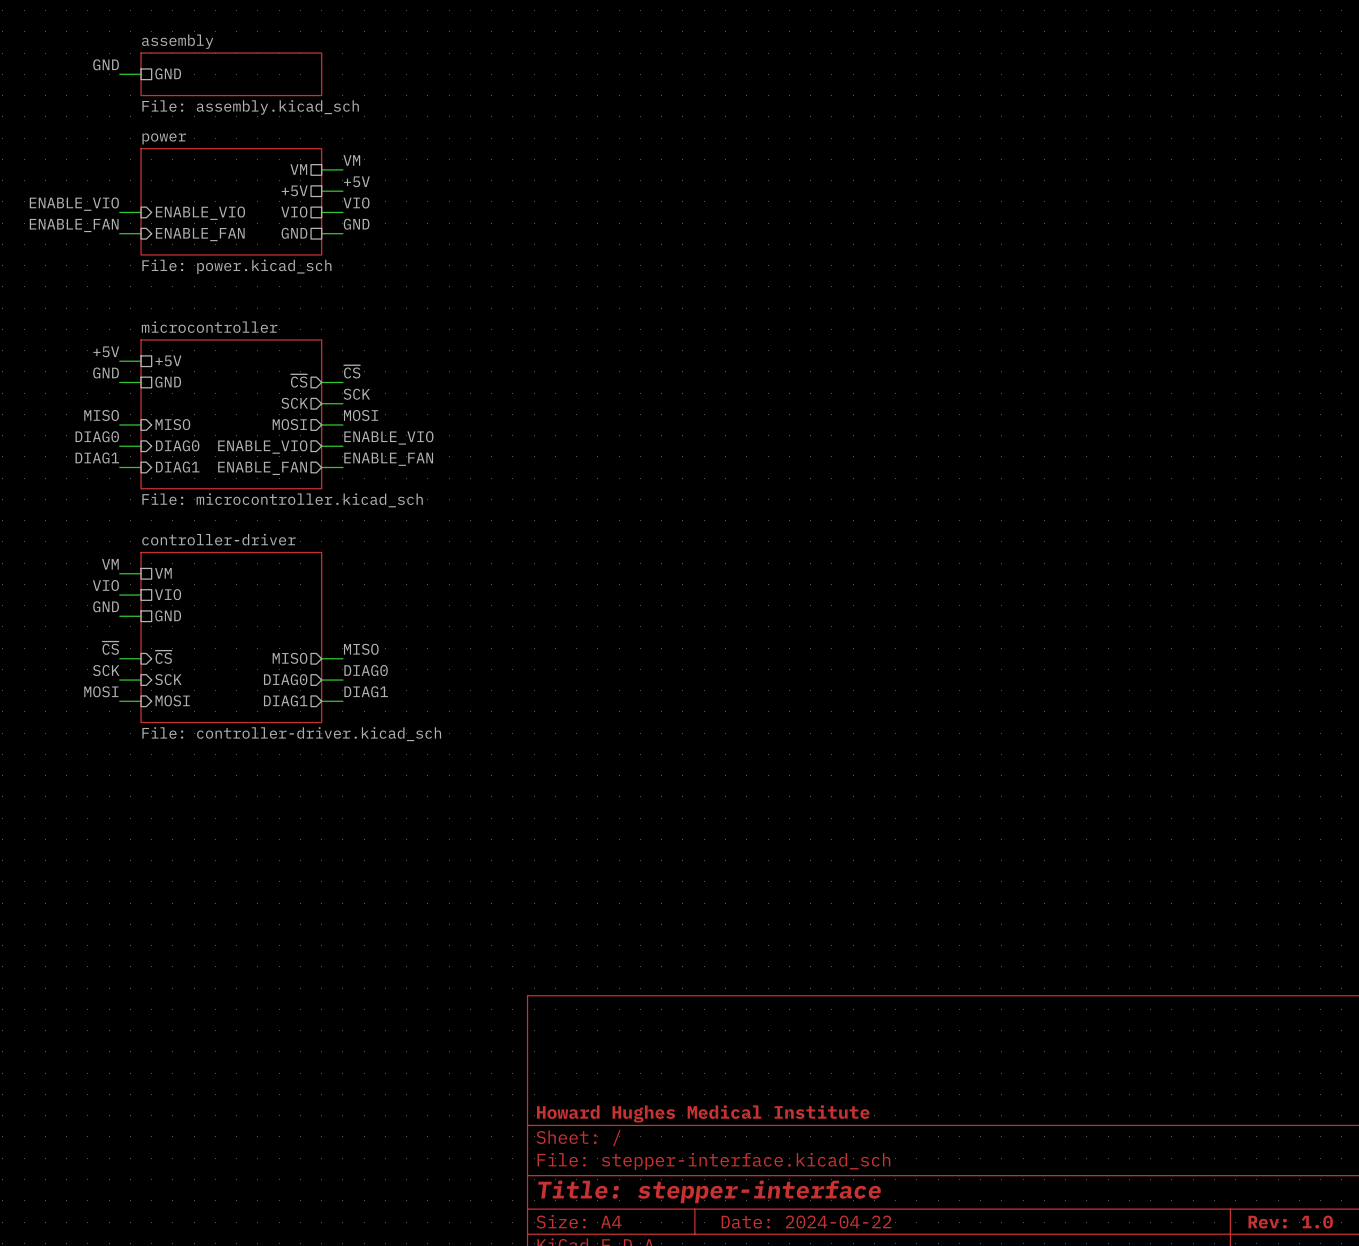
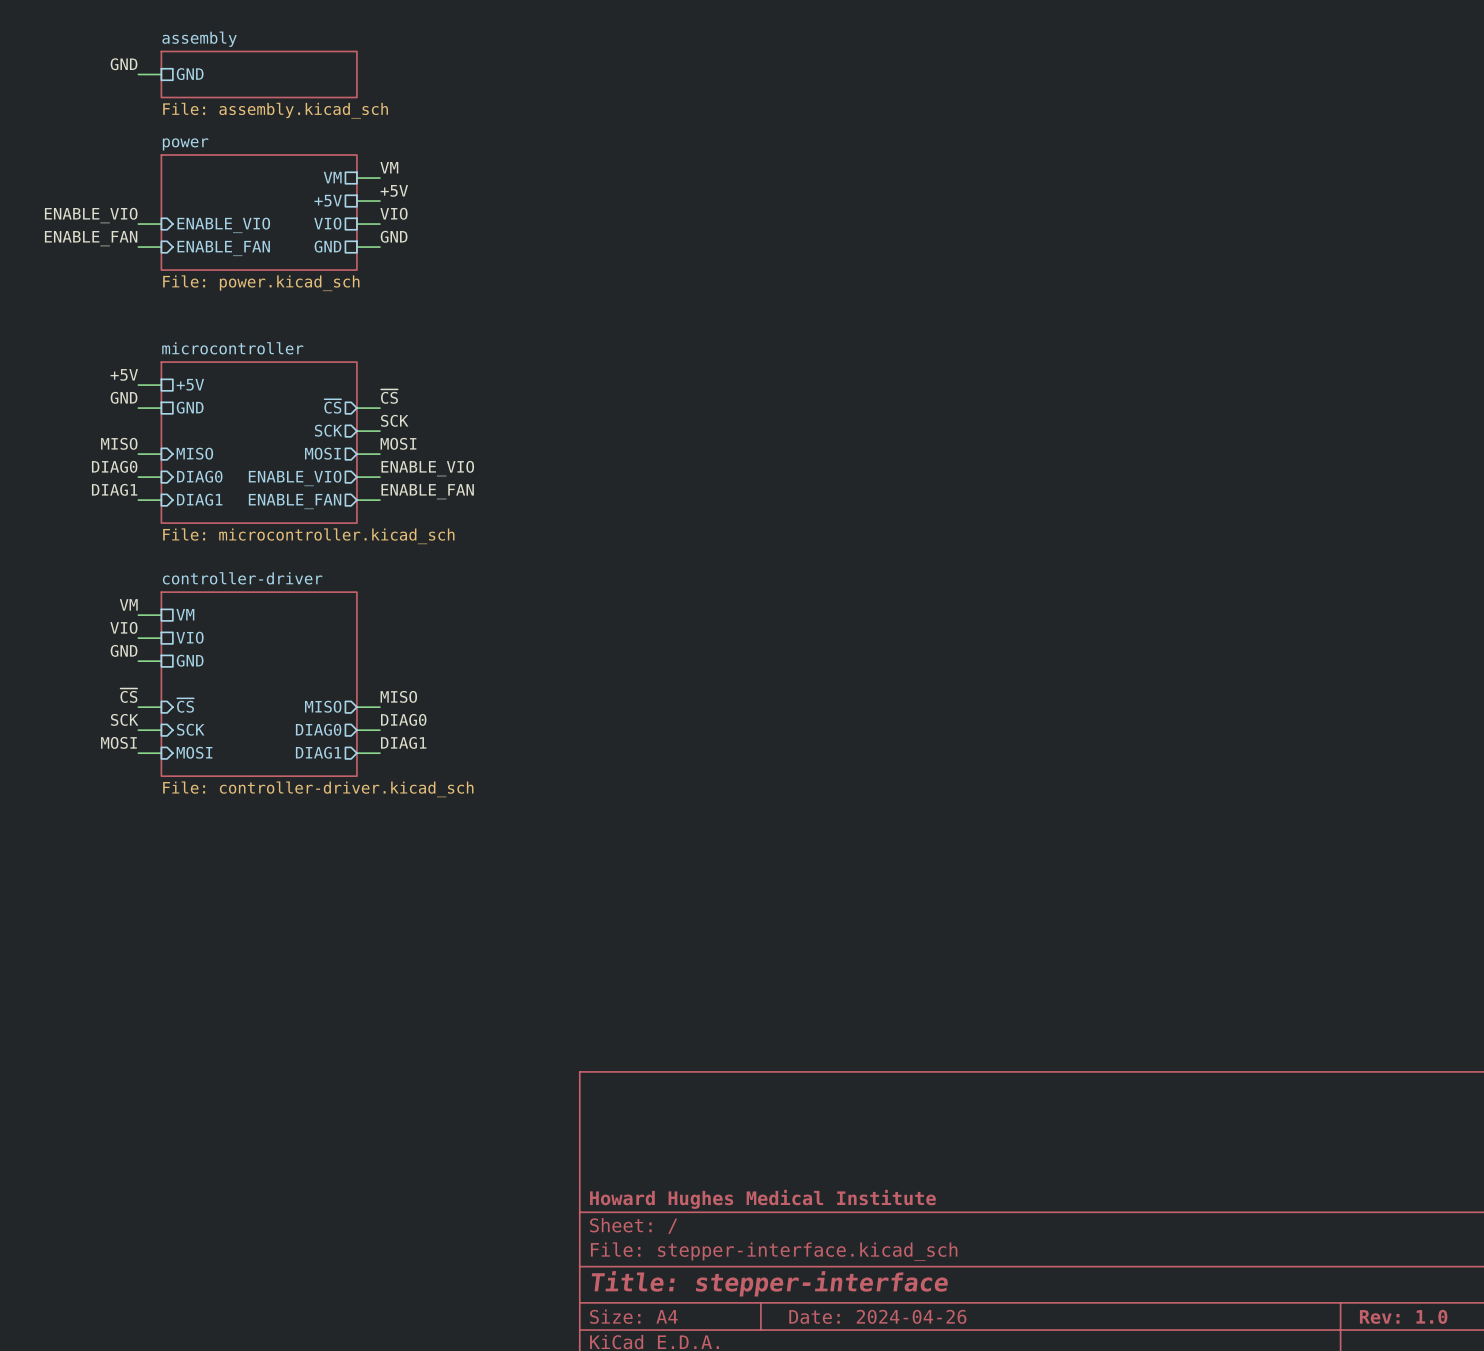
title block: Date: 2024-04-22 (806, 1222) -> Date: 2024-04-26 (877, 1316)

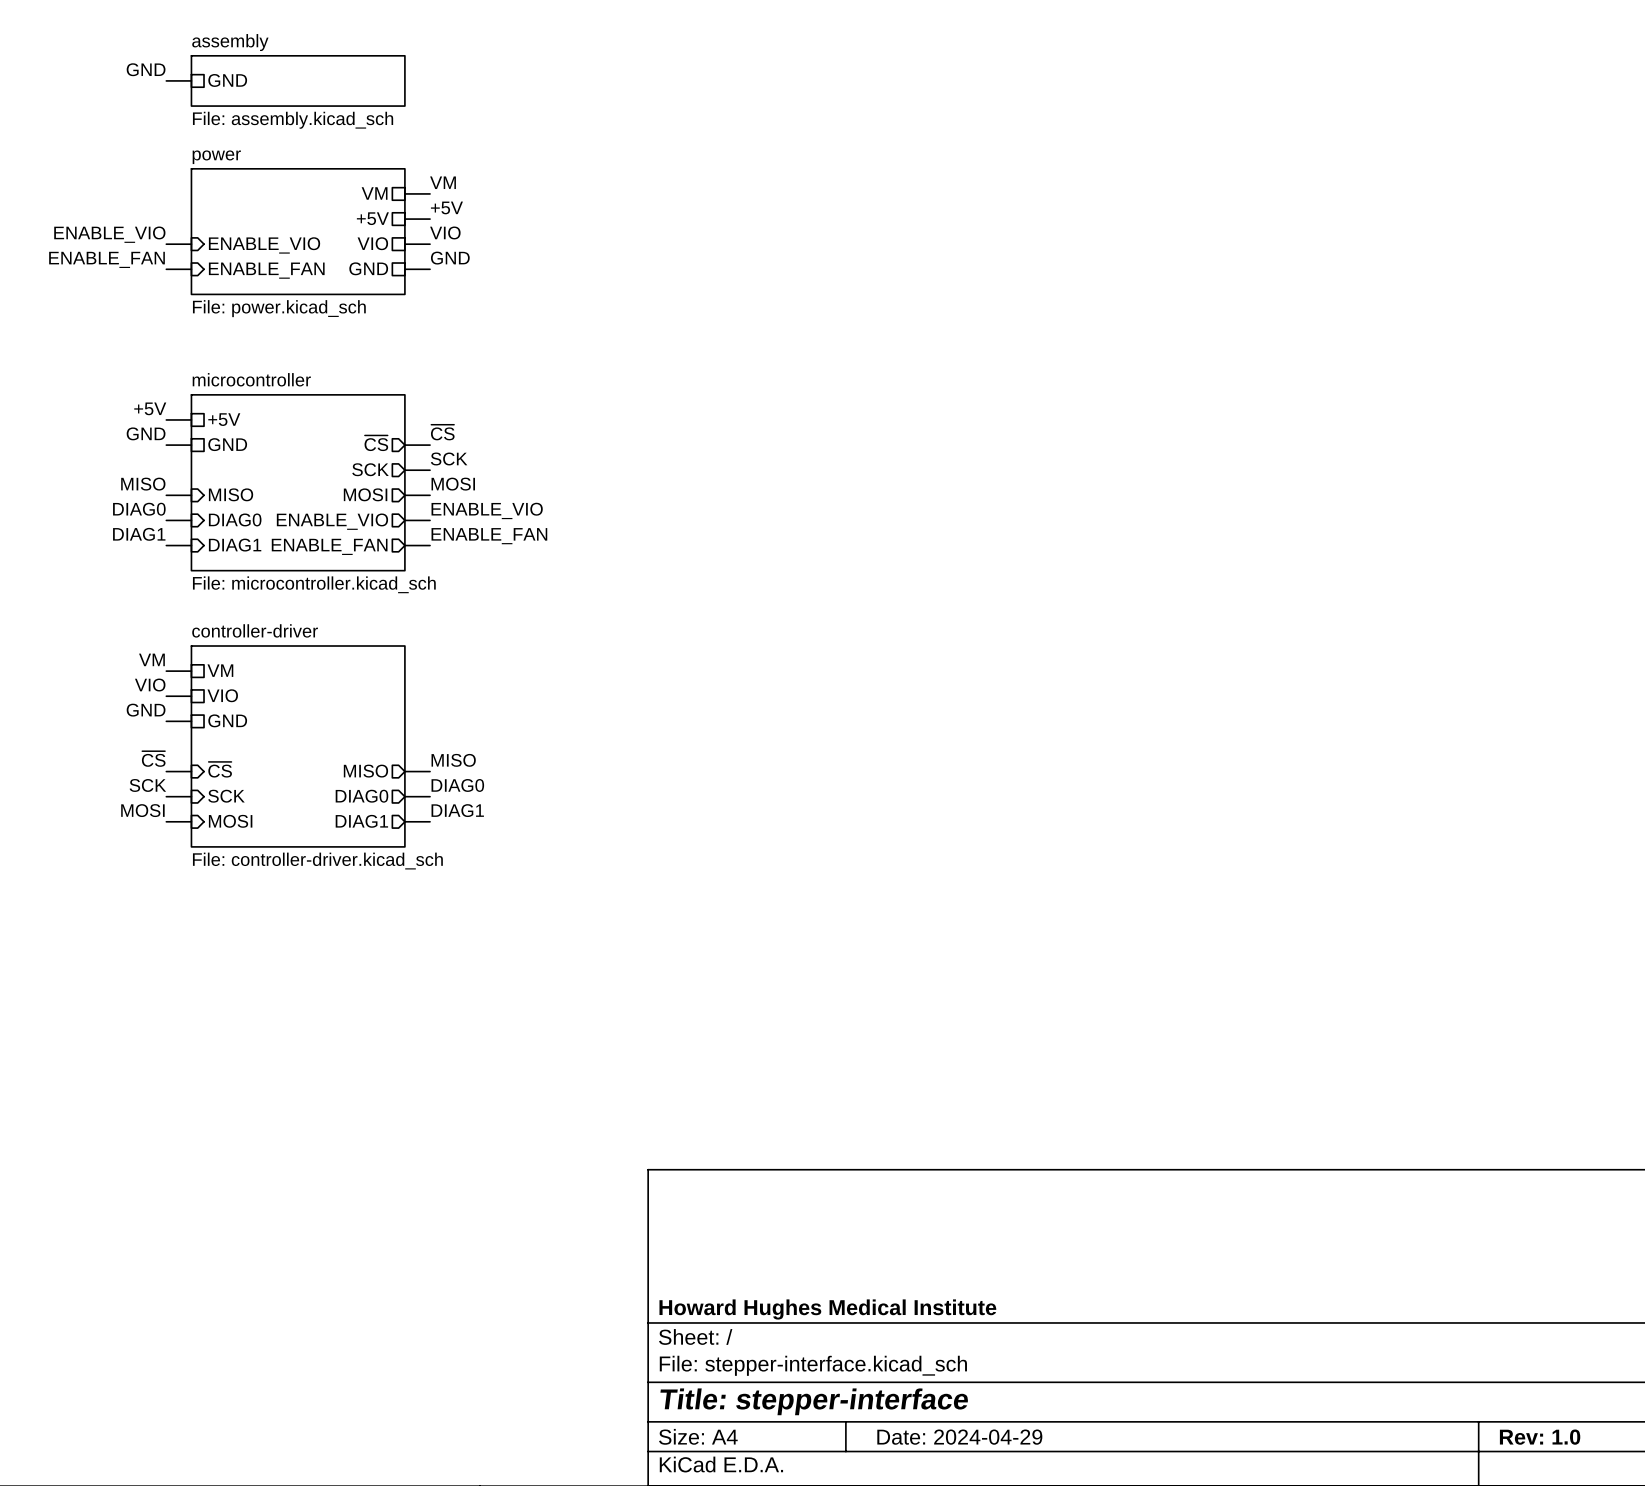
title block: Date: 2024-04-26 (877, 1316) -> Date: 2024-04-29 (959, 1437)

